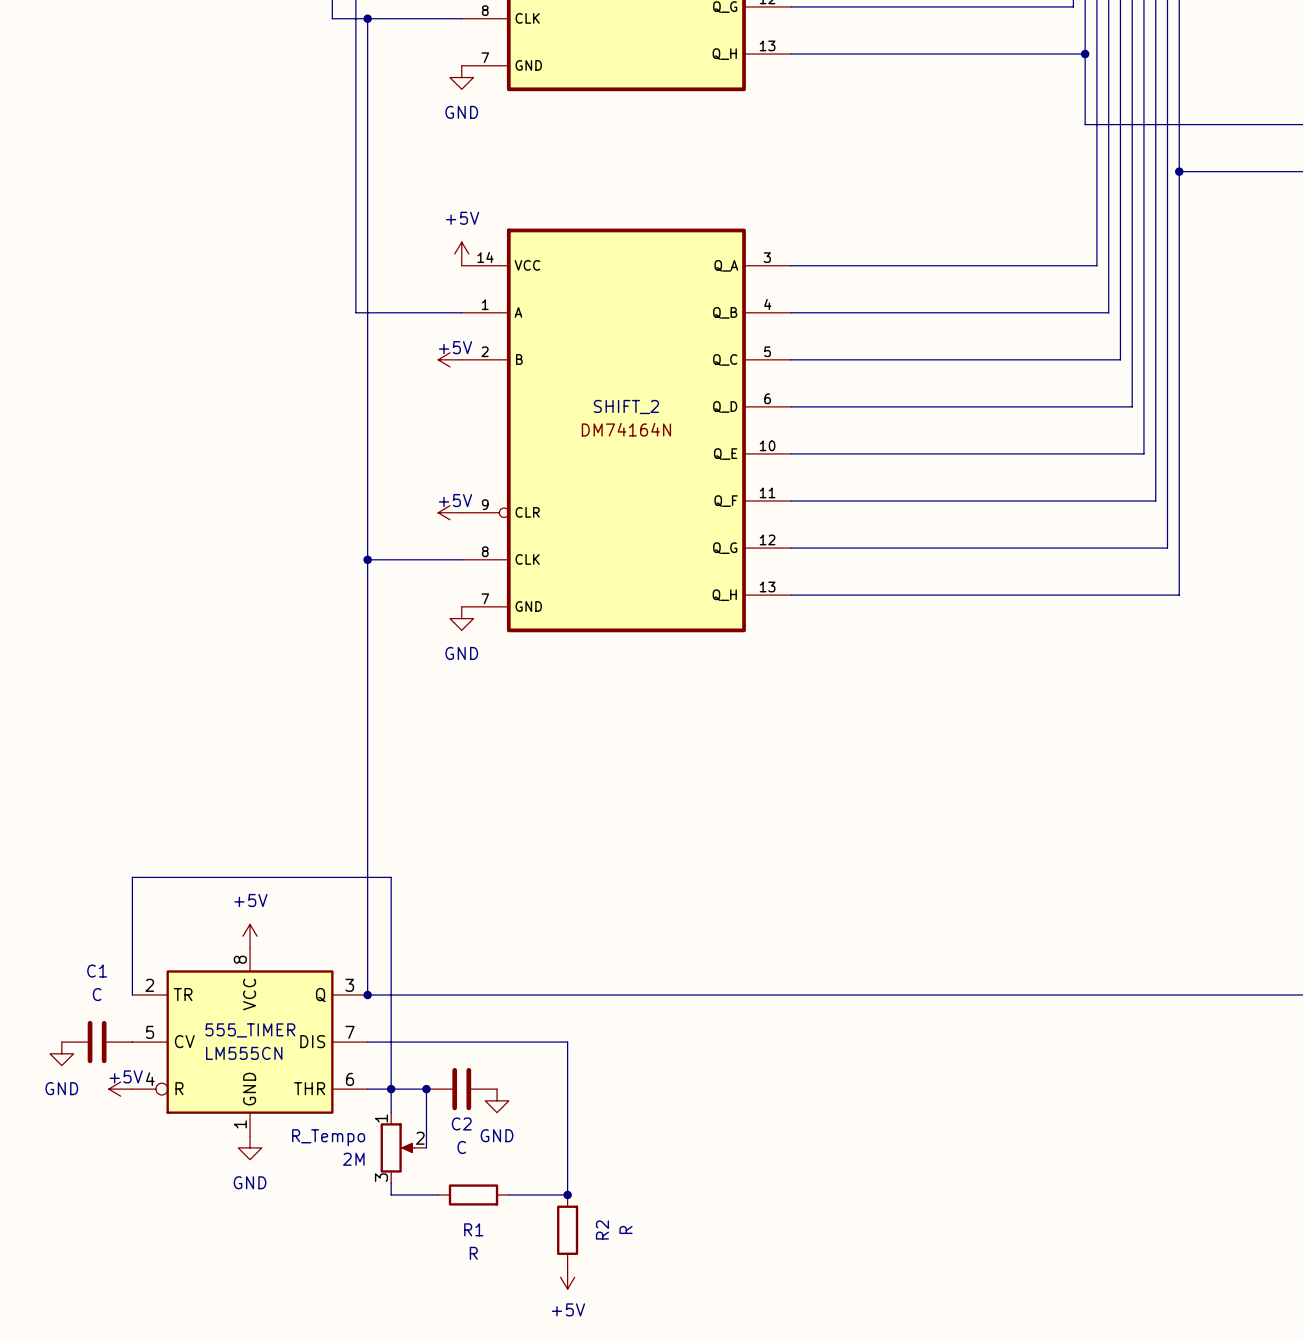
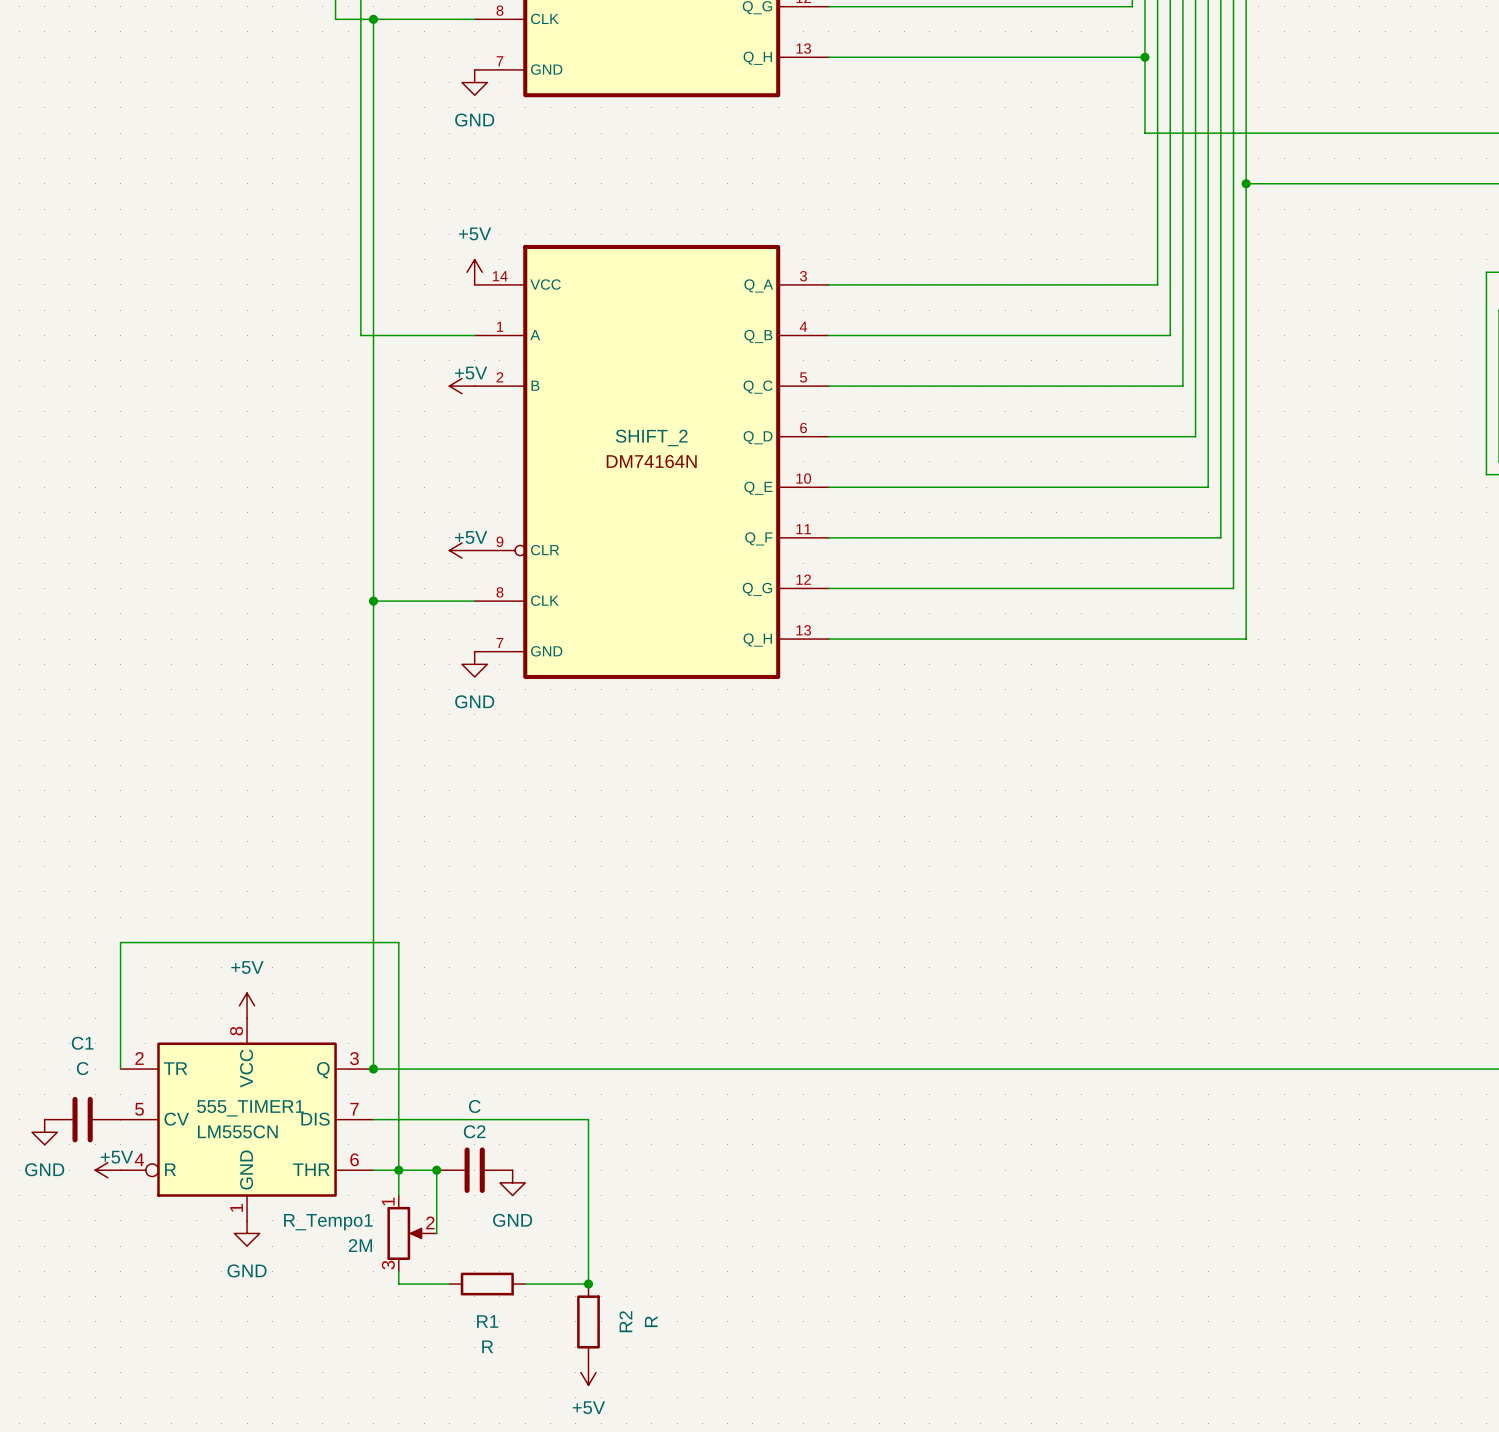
555_TIMER name: 555_TIMER (250, 1030) -> 555_TIMER1 (250, 1108)
C2 name position: C2 (461, 1123) -> C2 (474, 1131)
R_Tempo name: R_Tempo (328, 1137) -> R_Tempo1 (328, 1222)
C2 value position: C (461, 1147) -> C (474, 1106)

